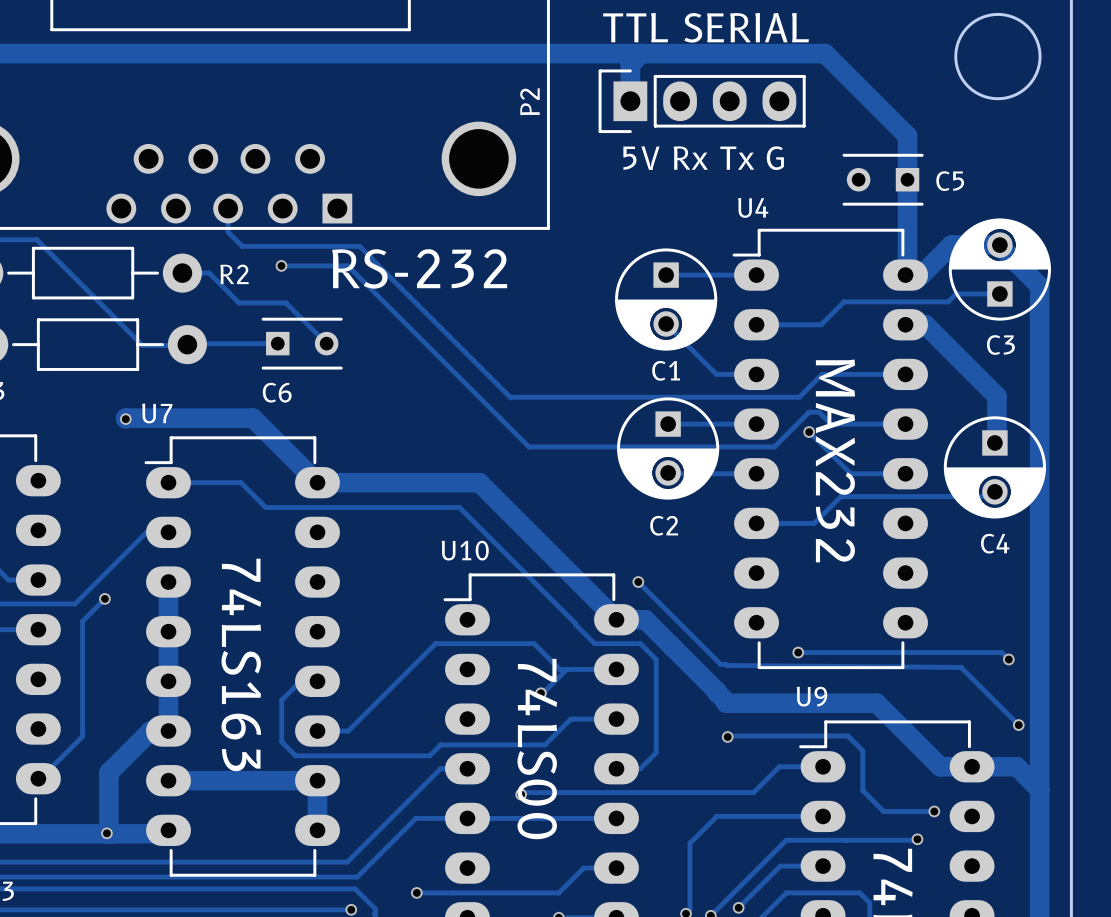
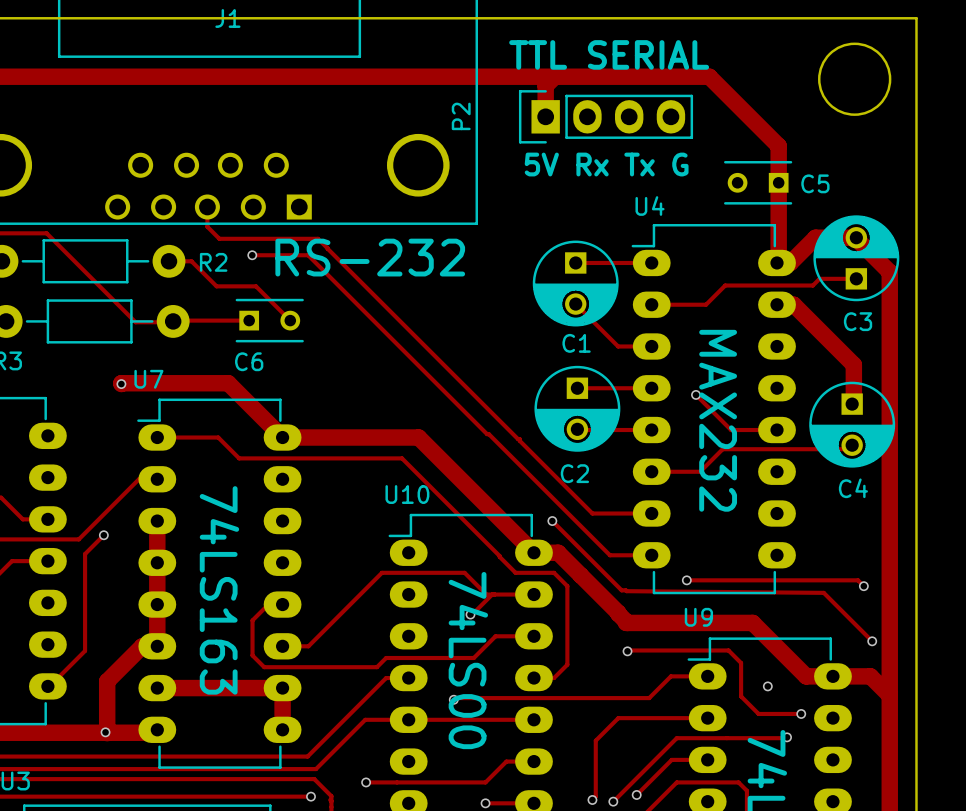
track: (905, 374) (822, 374) (799, 397) (510, 397) -> (651, 513) (592, 513) (445, 366)
track: (905, 424) (831, 424) (819, 412) (809, 412) (774, 446) (528, 446) -> (651, 555) (609, 555) (460, 407)
via: none -> (767, 686)

